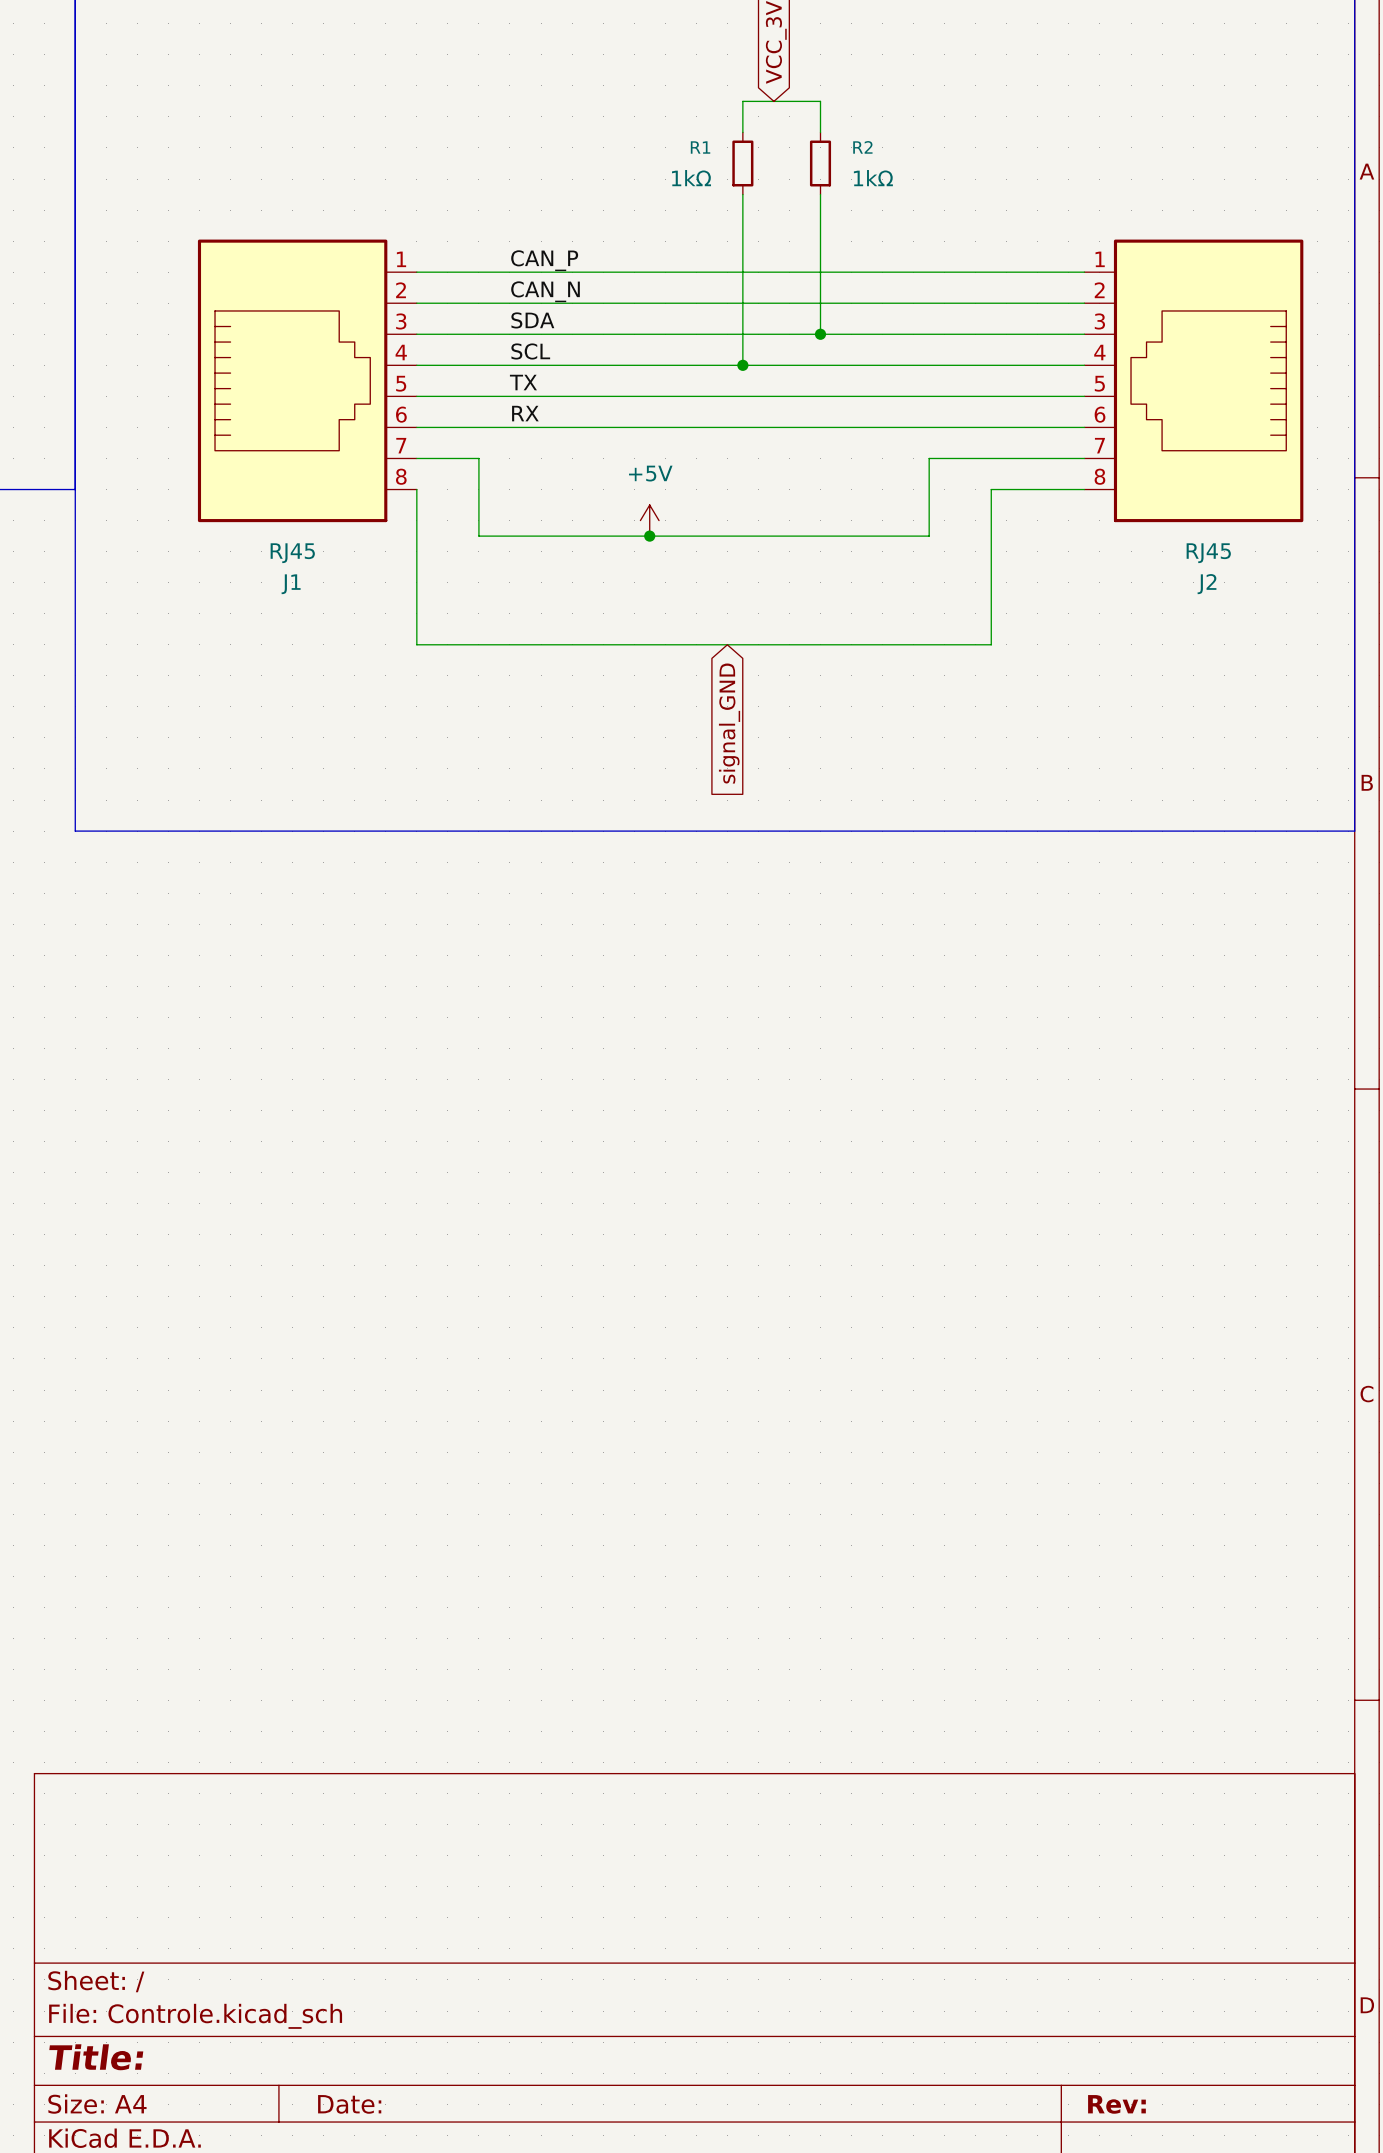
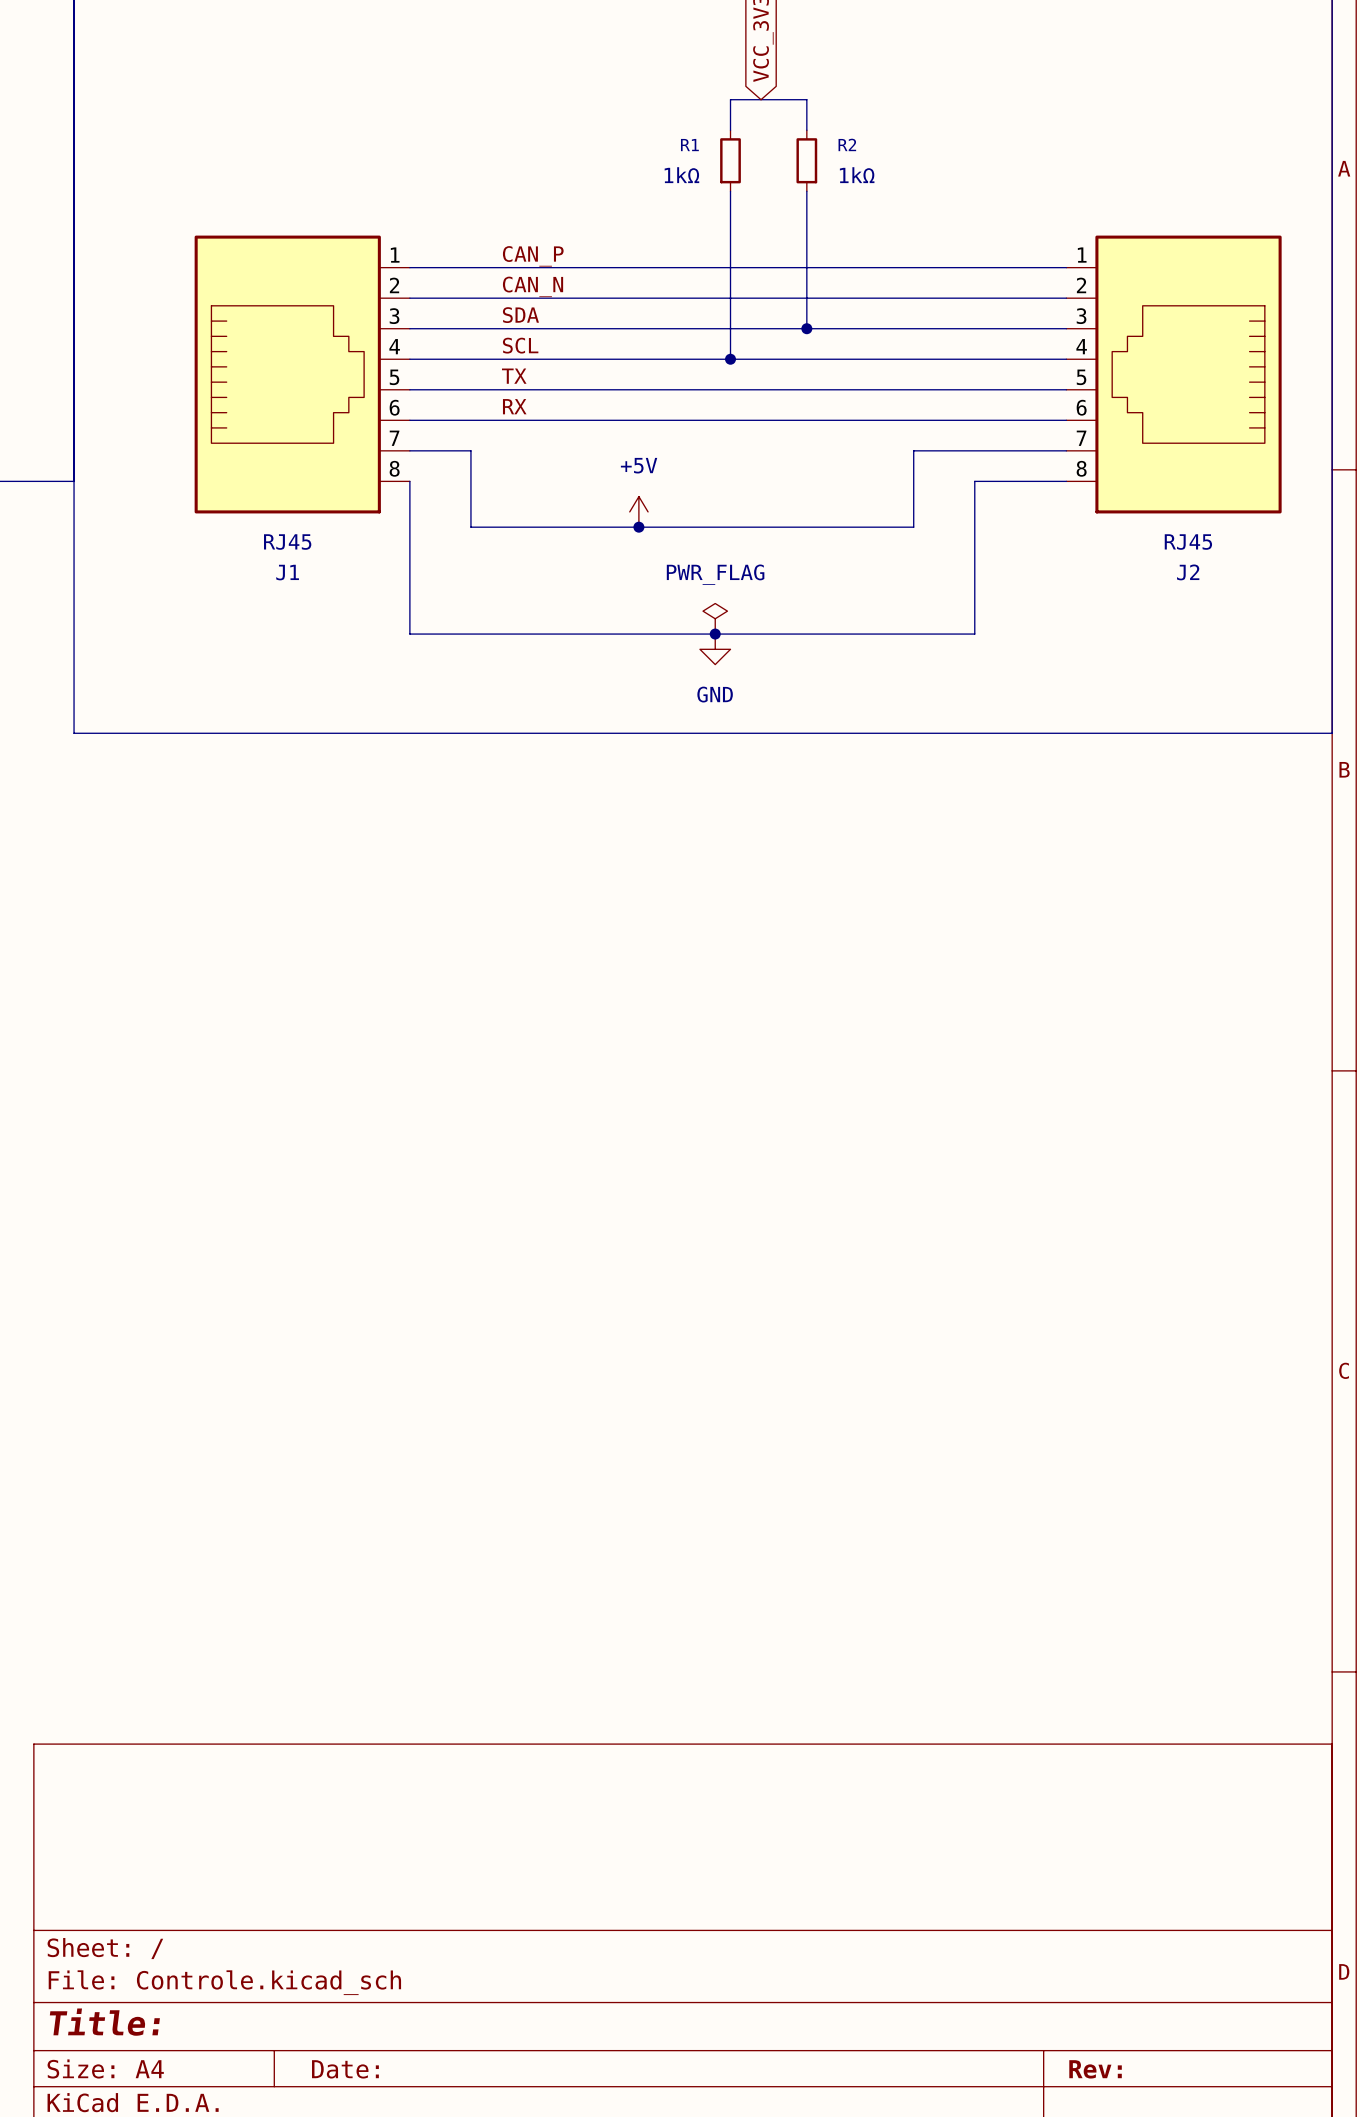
power symbol: none -> PWR_FLAG (715, 618)
junction: none -> (715, 634)
power symbol: none -> GND (715, 649)
global label: signal_GND (729, 723) -> none
line: (75, 745) (75, 831) (1354, 831) (1354, 745) -> (74, 733) (1332, 733)

